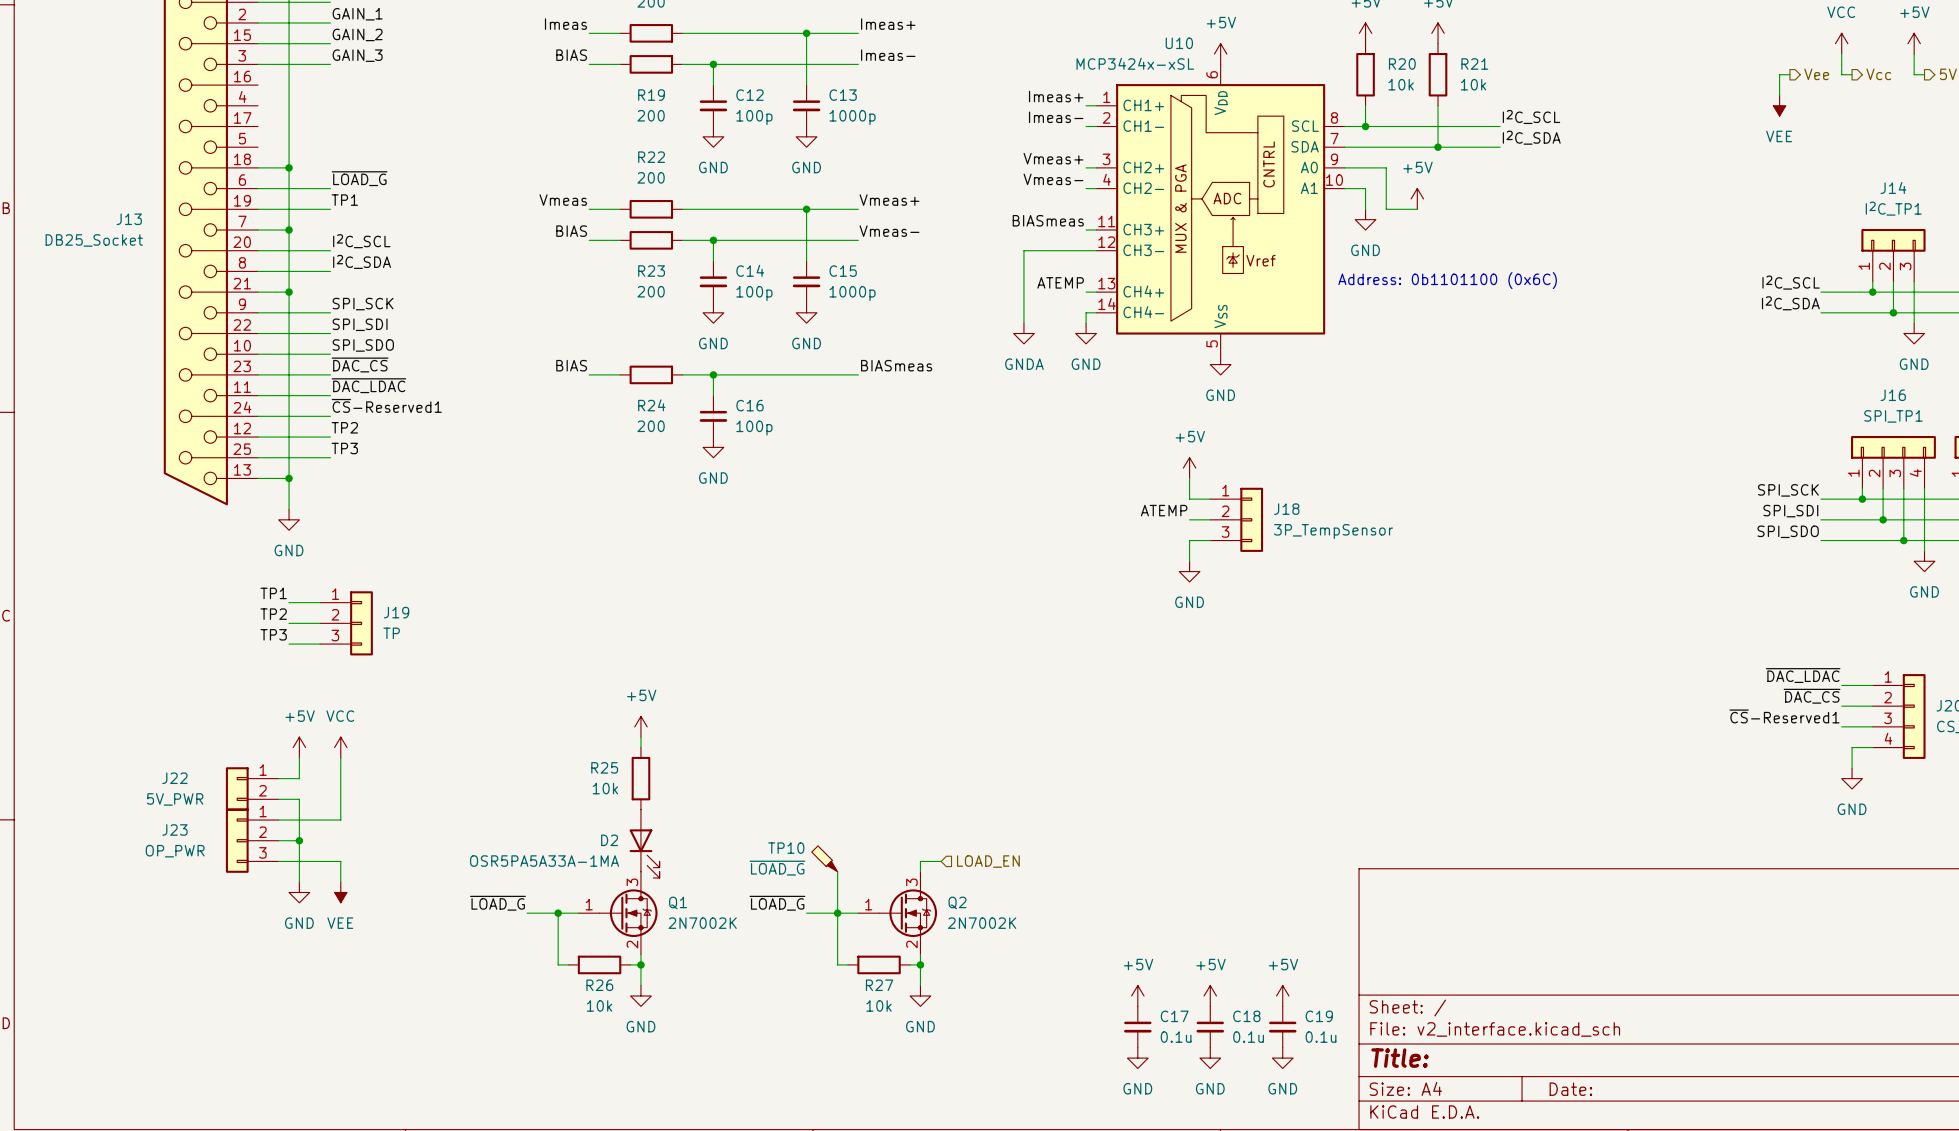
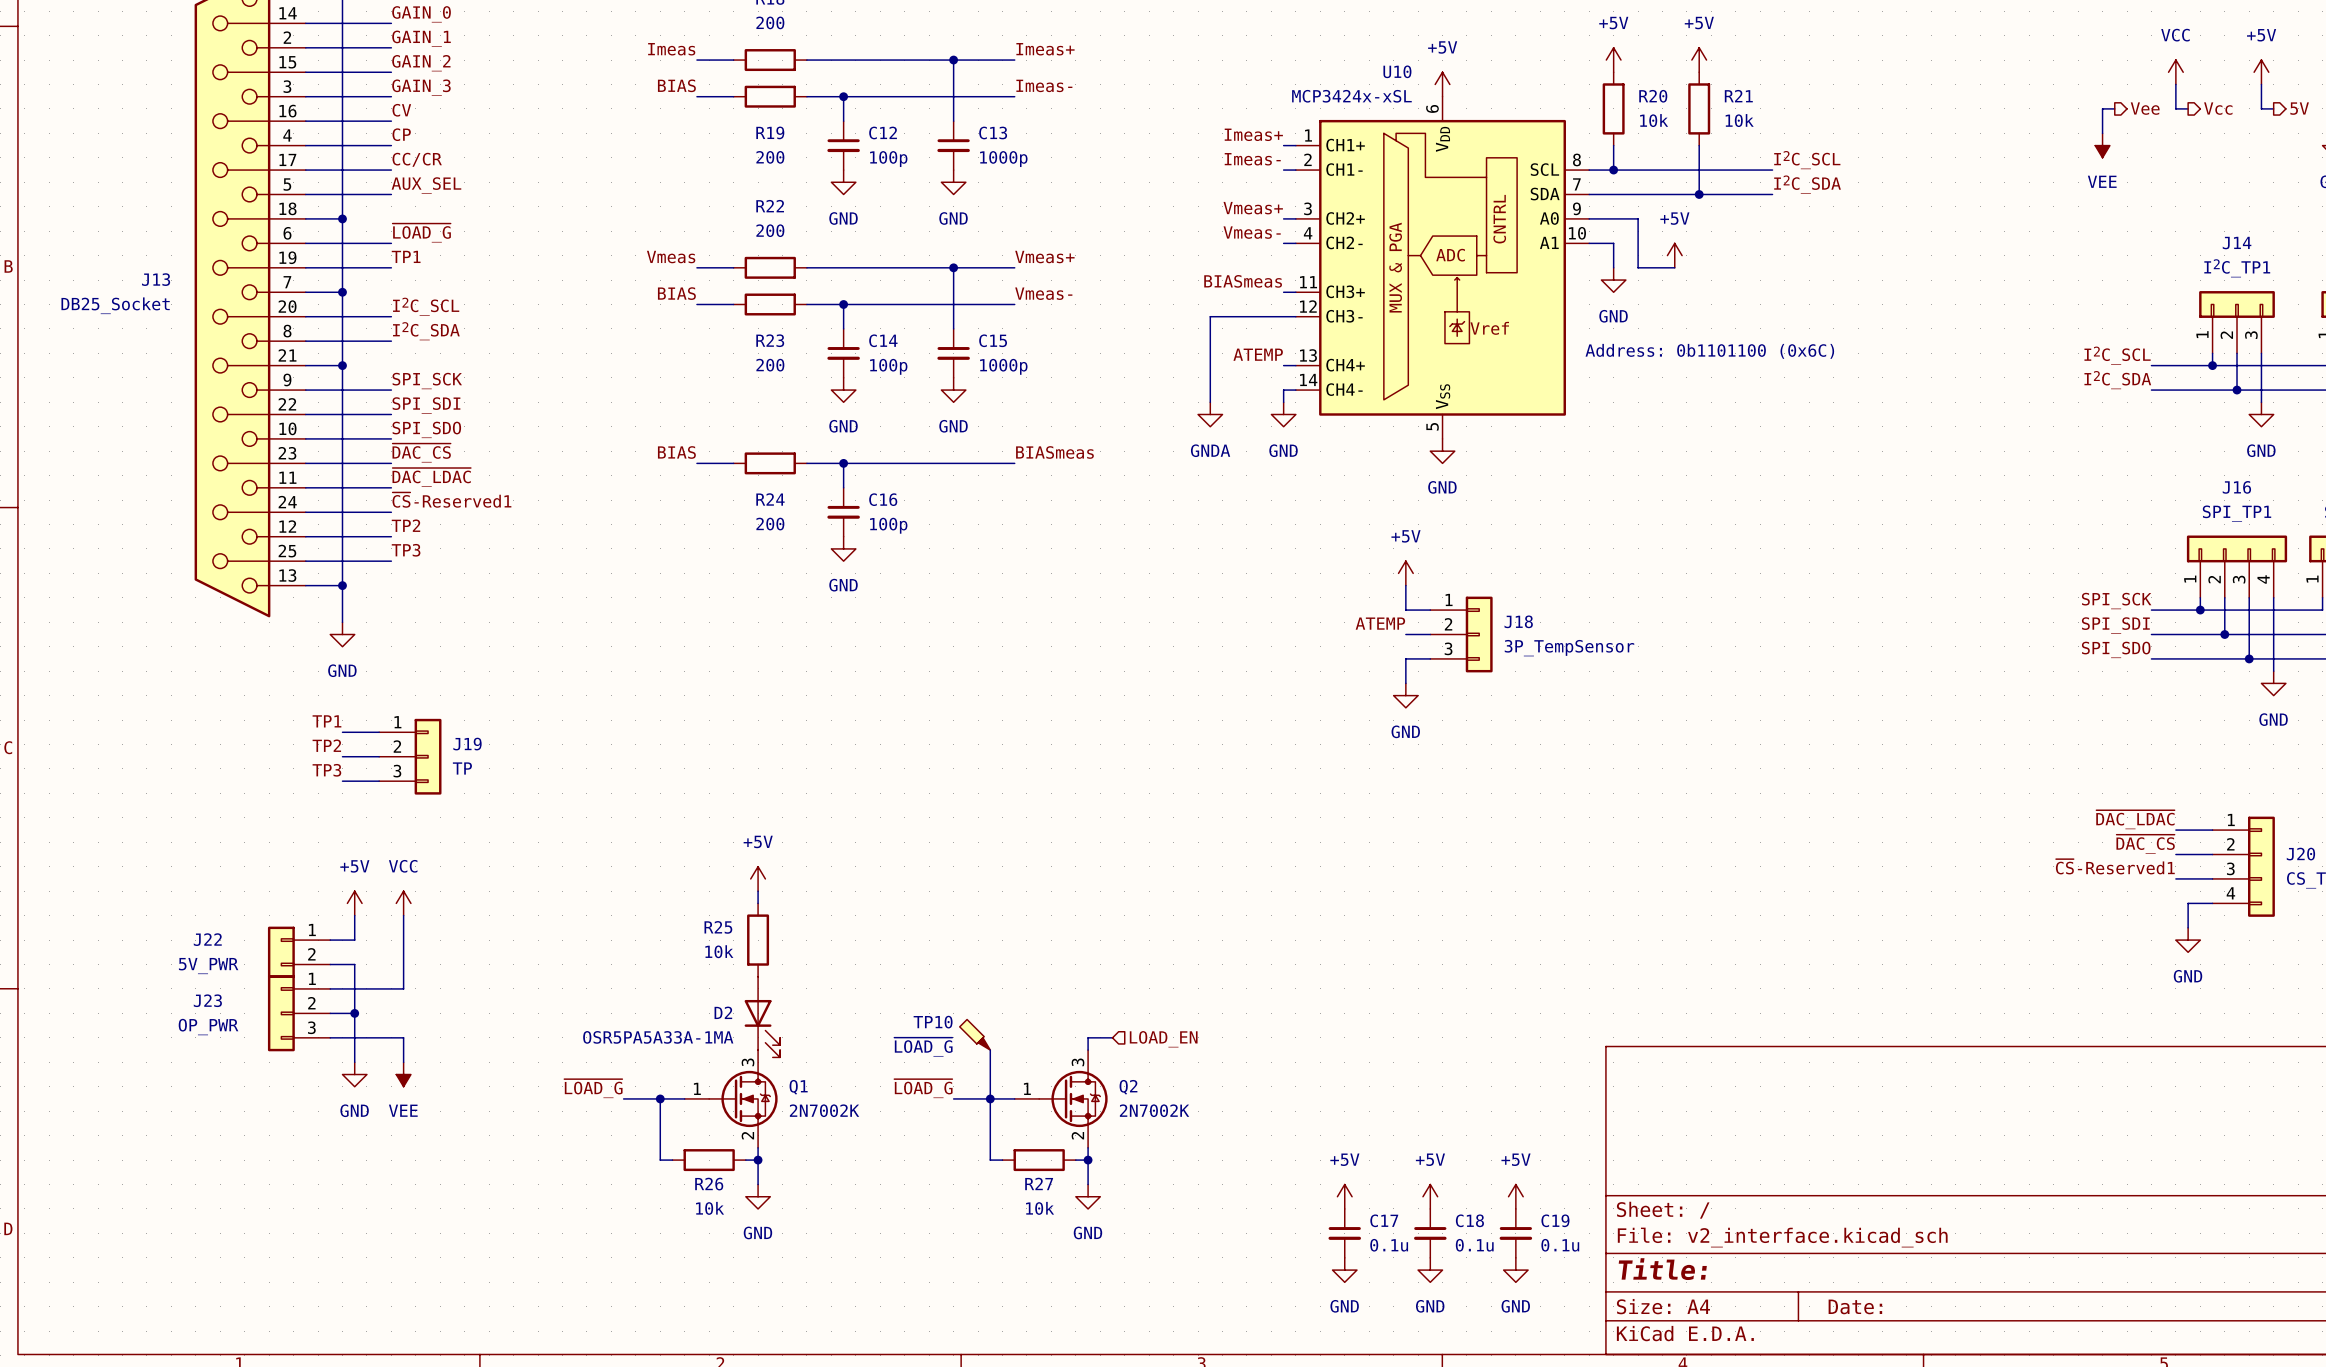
label: none -> CV (401, 110)
wire: none -> (305, 121) (391, 121)
label: none -> CP (401, 134)
wire: none -> (305, 145) (391, 145)
label: none -> CC/CR (417, 159)
wire: none -> (305, 170) (391, 170)
label: none -> AUX_SEL (426, 185)
wire: none -> (305, 194) (391, 194)

